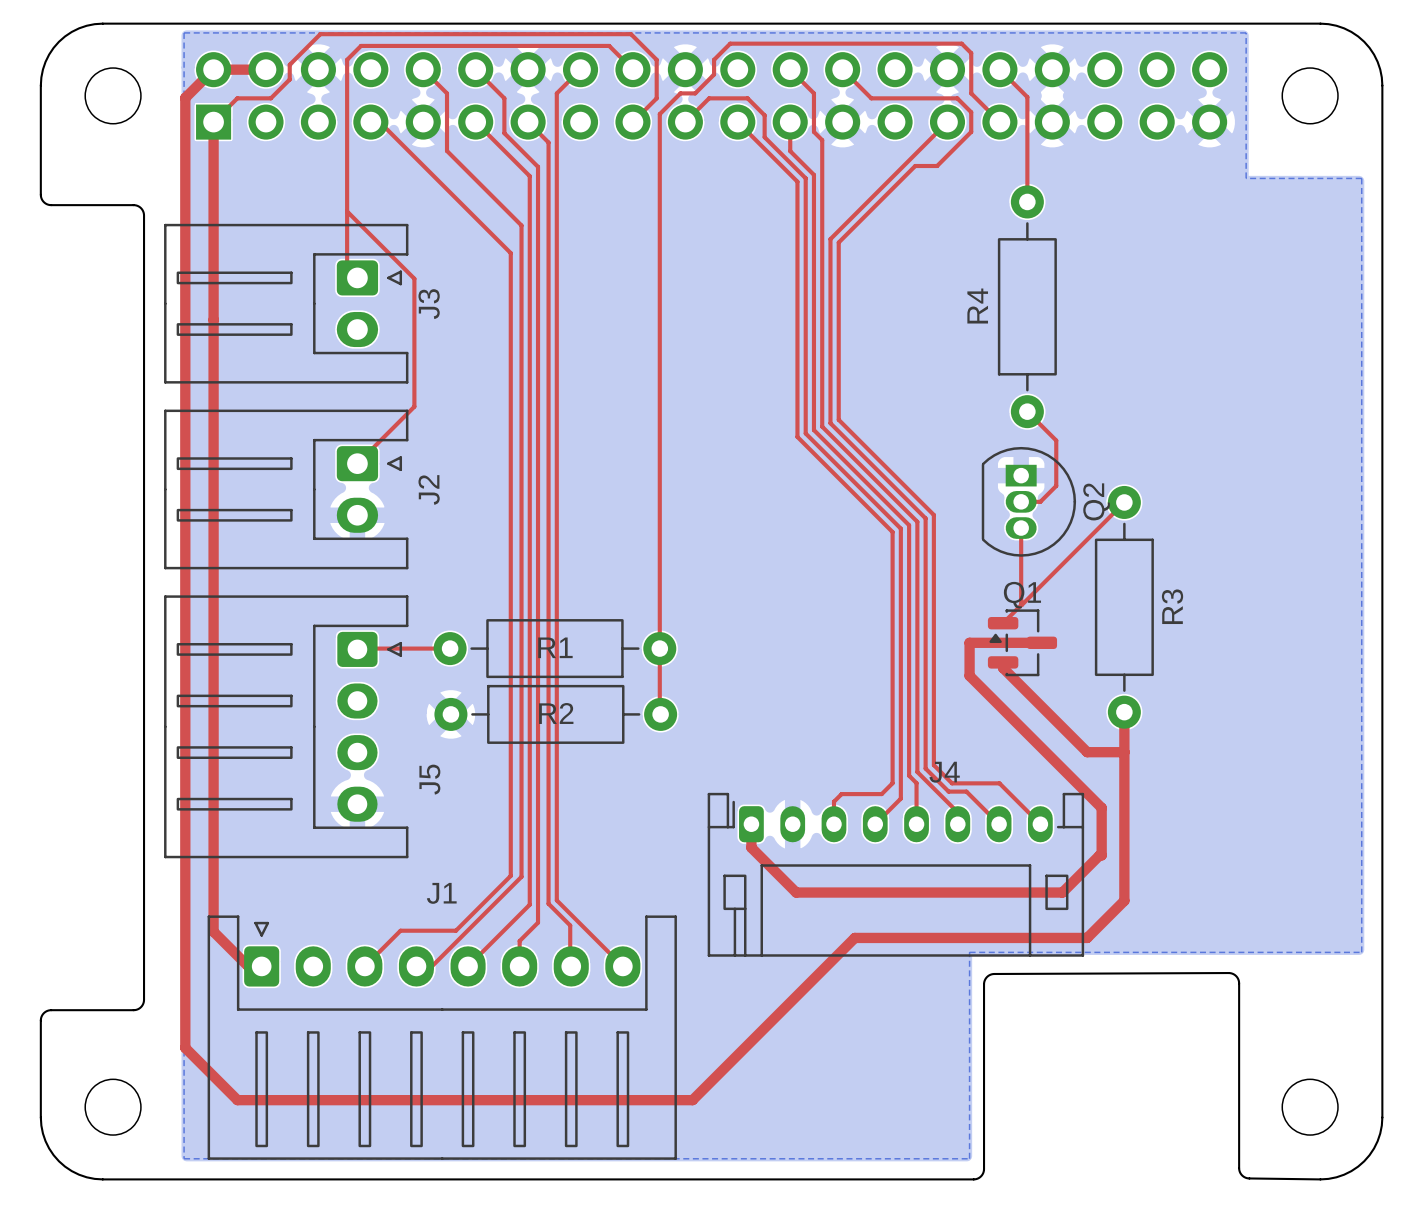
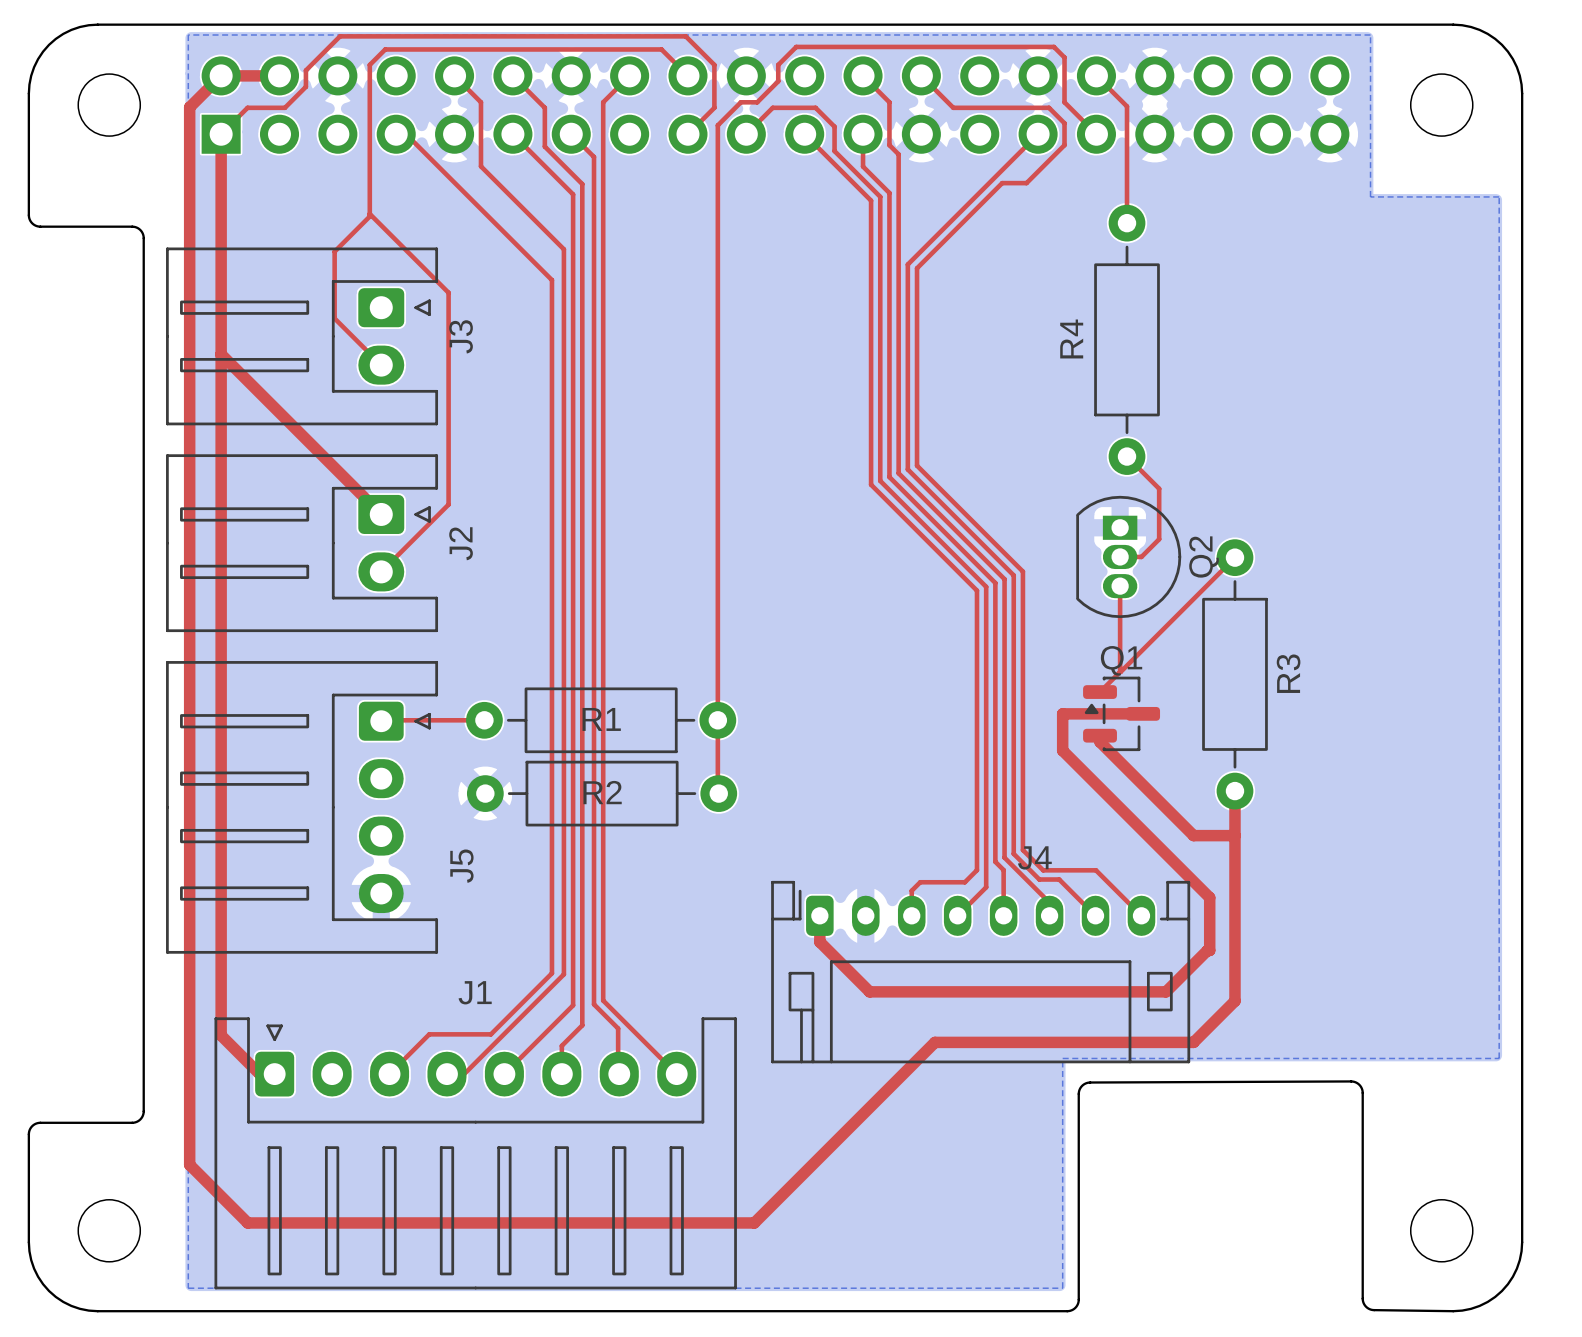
top track: none -> (369, 213) (448, 292) (448, 504) (381, 571)
top track: (347, 195) (347, 267) (357, 277) -> (369, 216) (334, 251) (334, 318) (381, 365)
top track: (347, 211) (414, 278) (414, 406) (357, 463) -> (221, 354) (381, 514)

